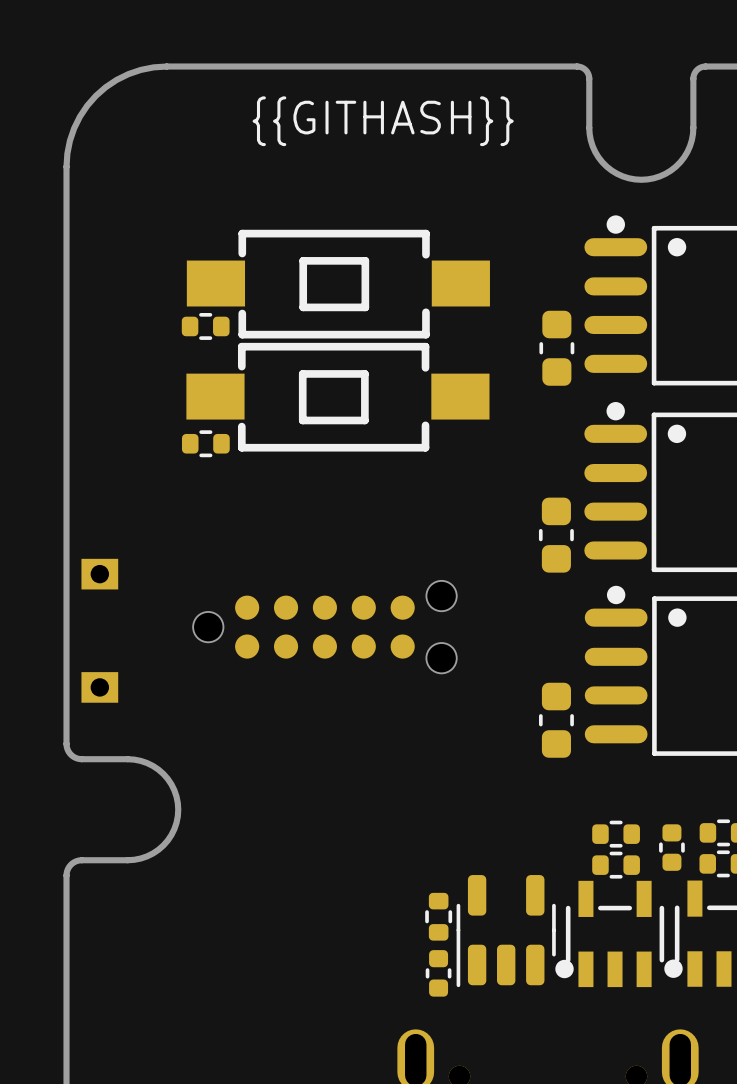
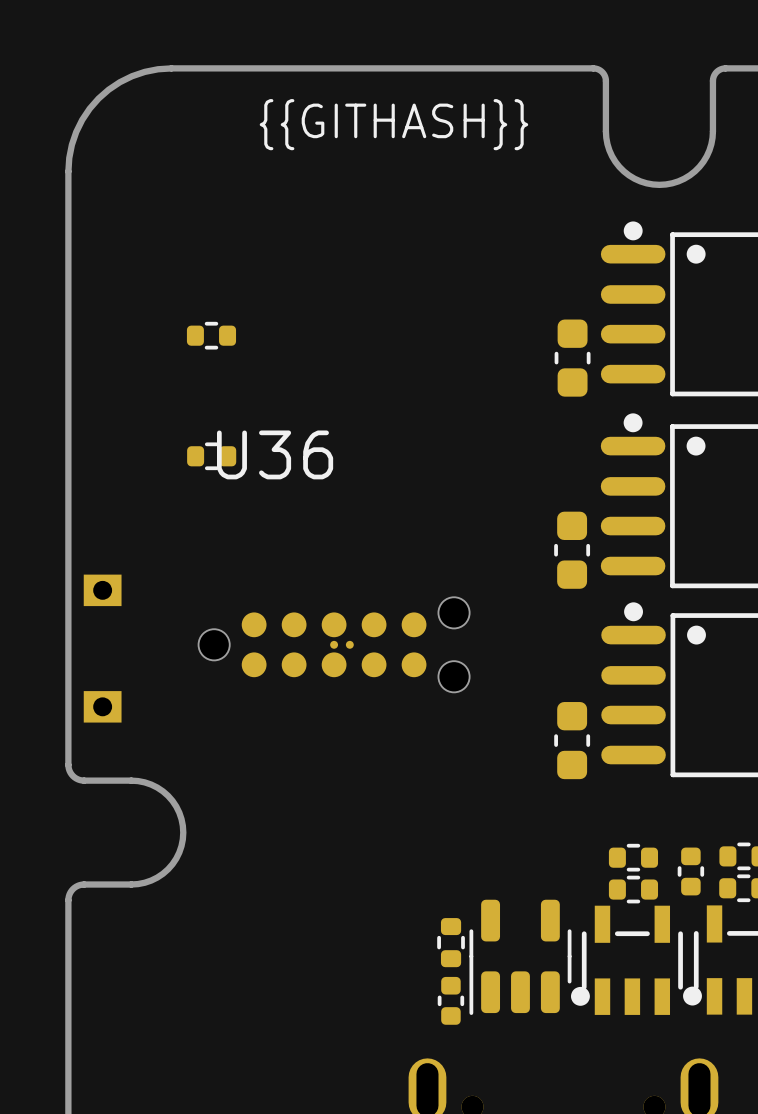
part: (338, 284) -> none
part: (337, 397) -> none
U36 name: none -> U36 (275, 454)
part: none -> (341, 644)

